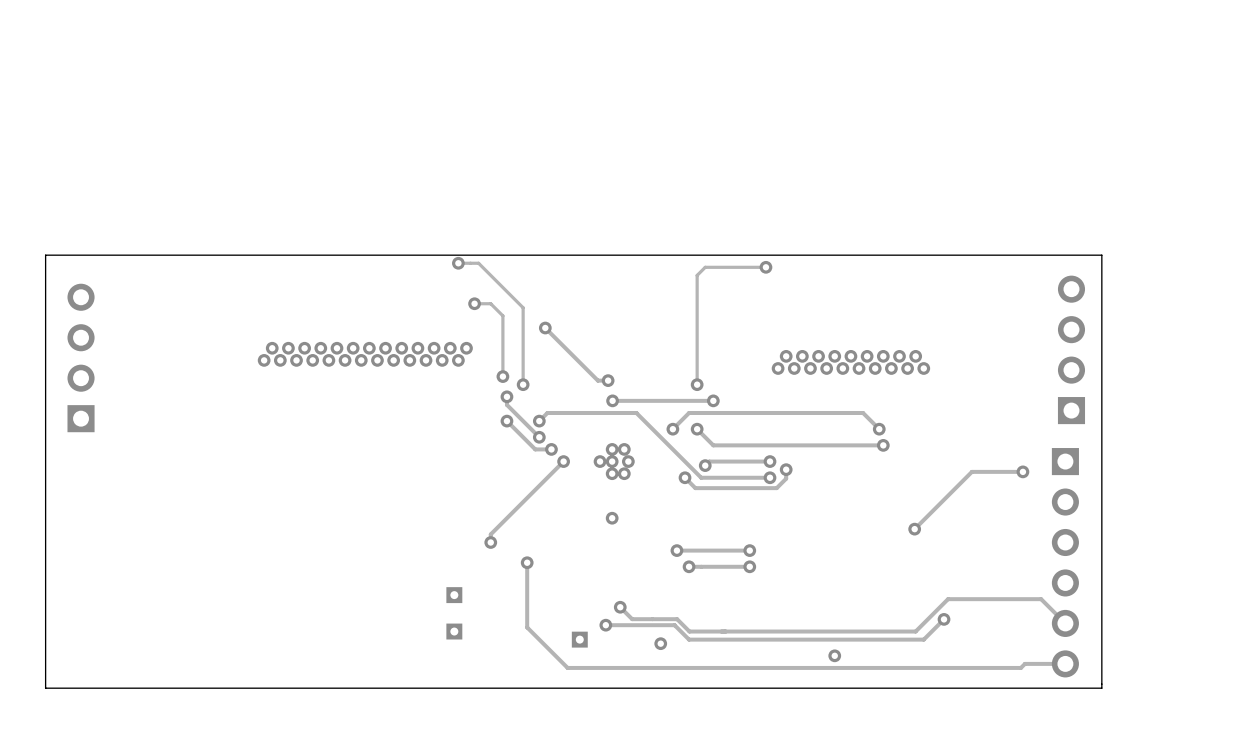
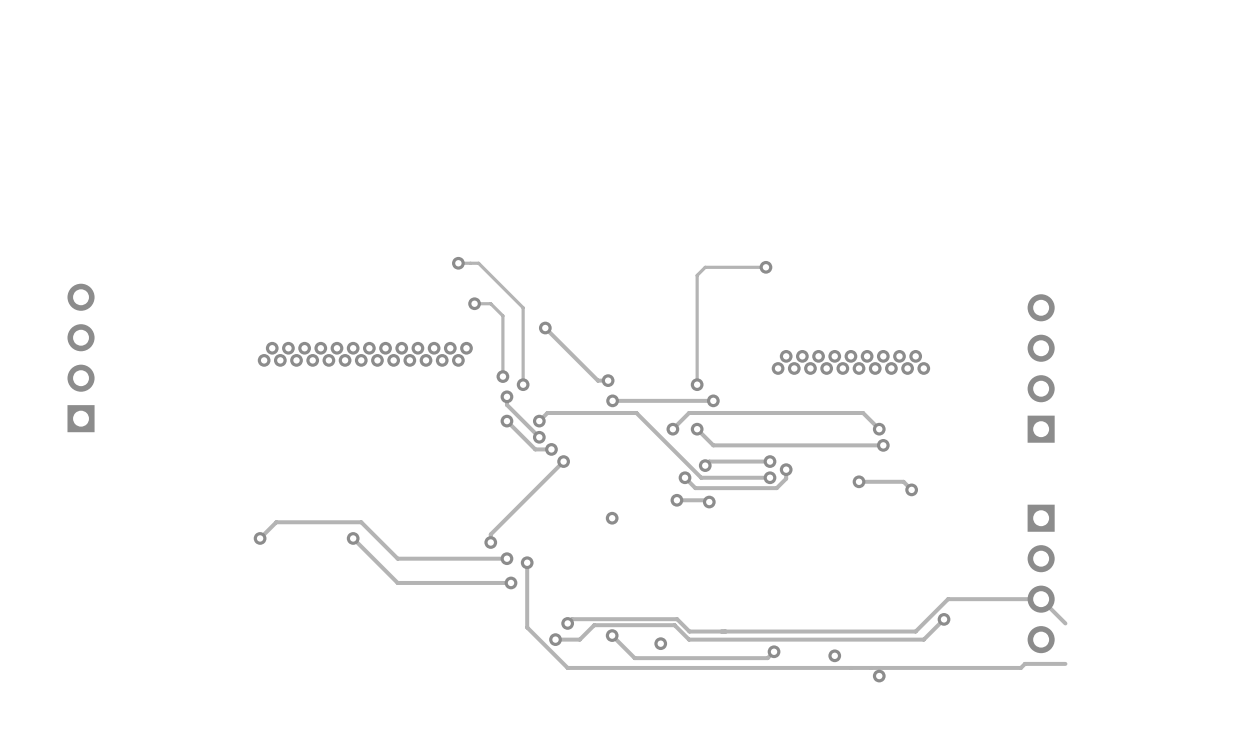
board edge: (1101, 255) (45, 255) (45, 688) (1101, 688) (1101, 255) -> none
part position: (1071, 349) -> (1041, 368)
via: (612, 449) -> none
via: (624, 449) -> none
via: (600, 461) -> none
via: (612, 461) -> none
via: (628, 461) -> none
track: (1022, 471) (971, 471) (914, 529) -> none
via: (1022, 471) -> none
via: (612, 473) -> none
via: (624, 473) -> none
track: none -> (859, 481) (903, 481) (911, 489)
via: none -> (859, 481)
via: none -> (911, 489)
track: none -> (676, 500) (707, 500) (709, 502)
via: none -> (676, 500)
via: none -> (709, 502)
via: (914, 529) -> none
track: none -> (260, 538) (276, 522) (361, 522) (397, 558) (506, 558)
via: none -> (260, 538)
track: none -> (353, 538) (397, 582) (511, 582)
via: none -> (353, 538)
via: (676, 550) -> none
track: (749, 550) (676, 550) -> none
via: (749, 550) -> none
via: none -> (506, 558)
part: (1065, 562) -> none
via: (689, 566) -> none
track: (749, 566) (689, 566) -> none
via: (749, 566) -> none
part: none -> (1041, 578)
via: none -> (511, 582)
part: (454, 595) -> none
track: (620, 607) (632, 619) -> (567, 623) (571, 619) (632, 619)
via: (620, 607) -> none
via: none -> (567, 623)
track: none -> (605, 625) (594, 625) (579, 639) (555, 639)
via position: (605, 625) -> (612, 635)
part: (454, 631) -> none
track: none -> (612, 635) (634, 658) (767, 658) (774, 651)
via: none -> (555, 639)
part: (579, 639) -> none
via: none -> (774, 651)
via: none -> (879, 676)

